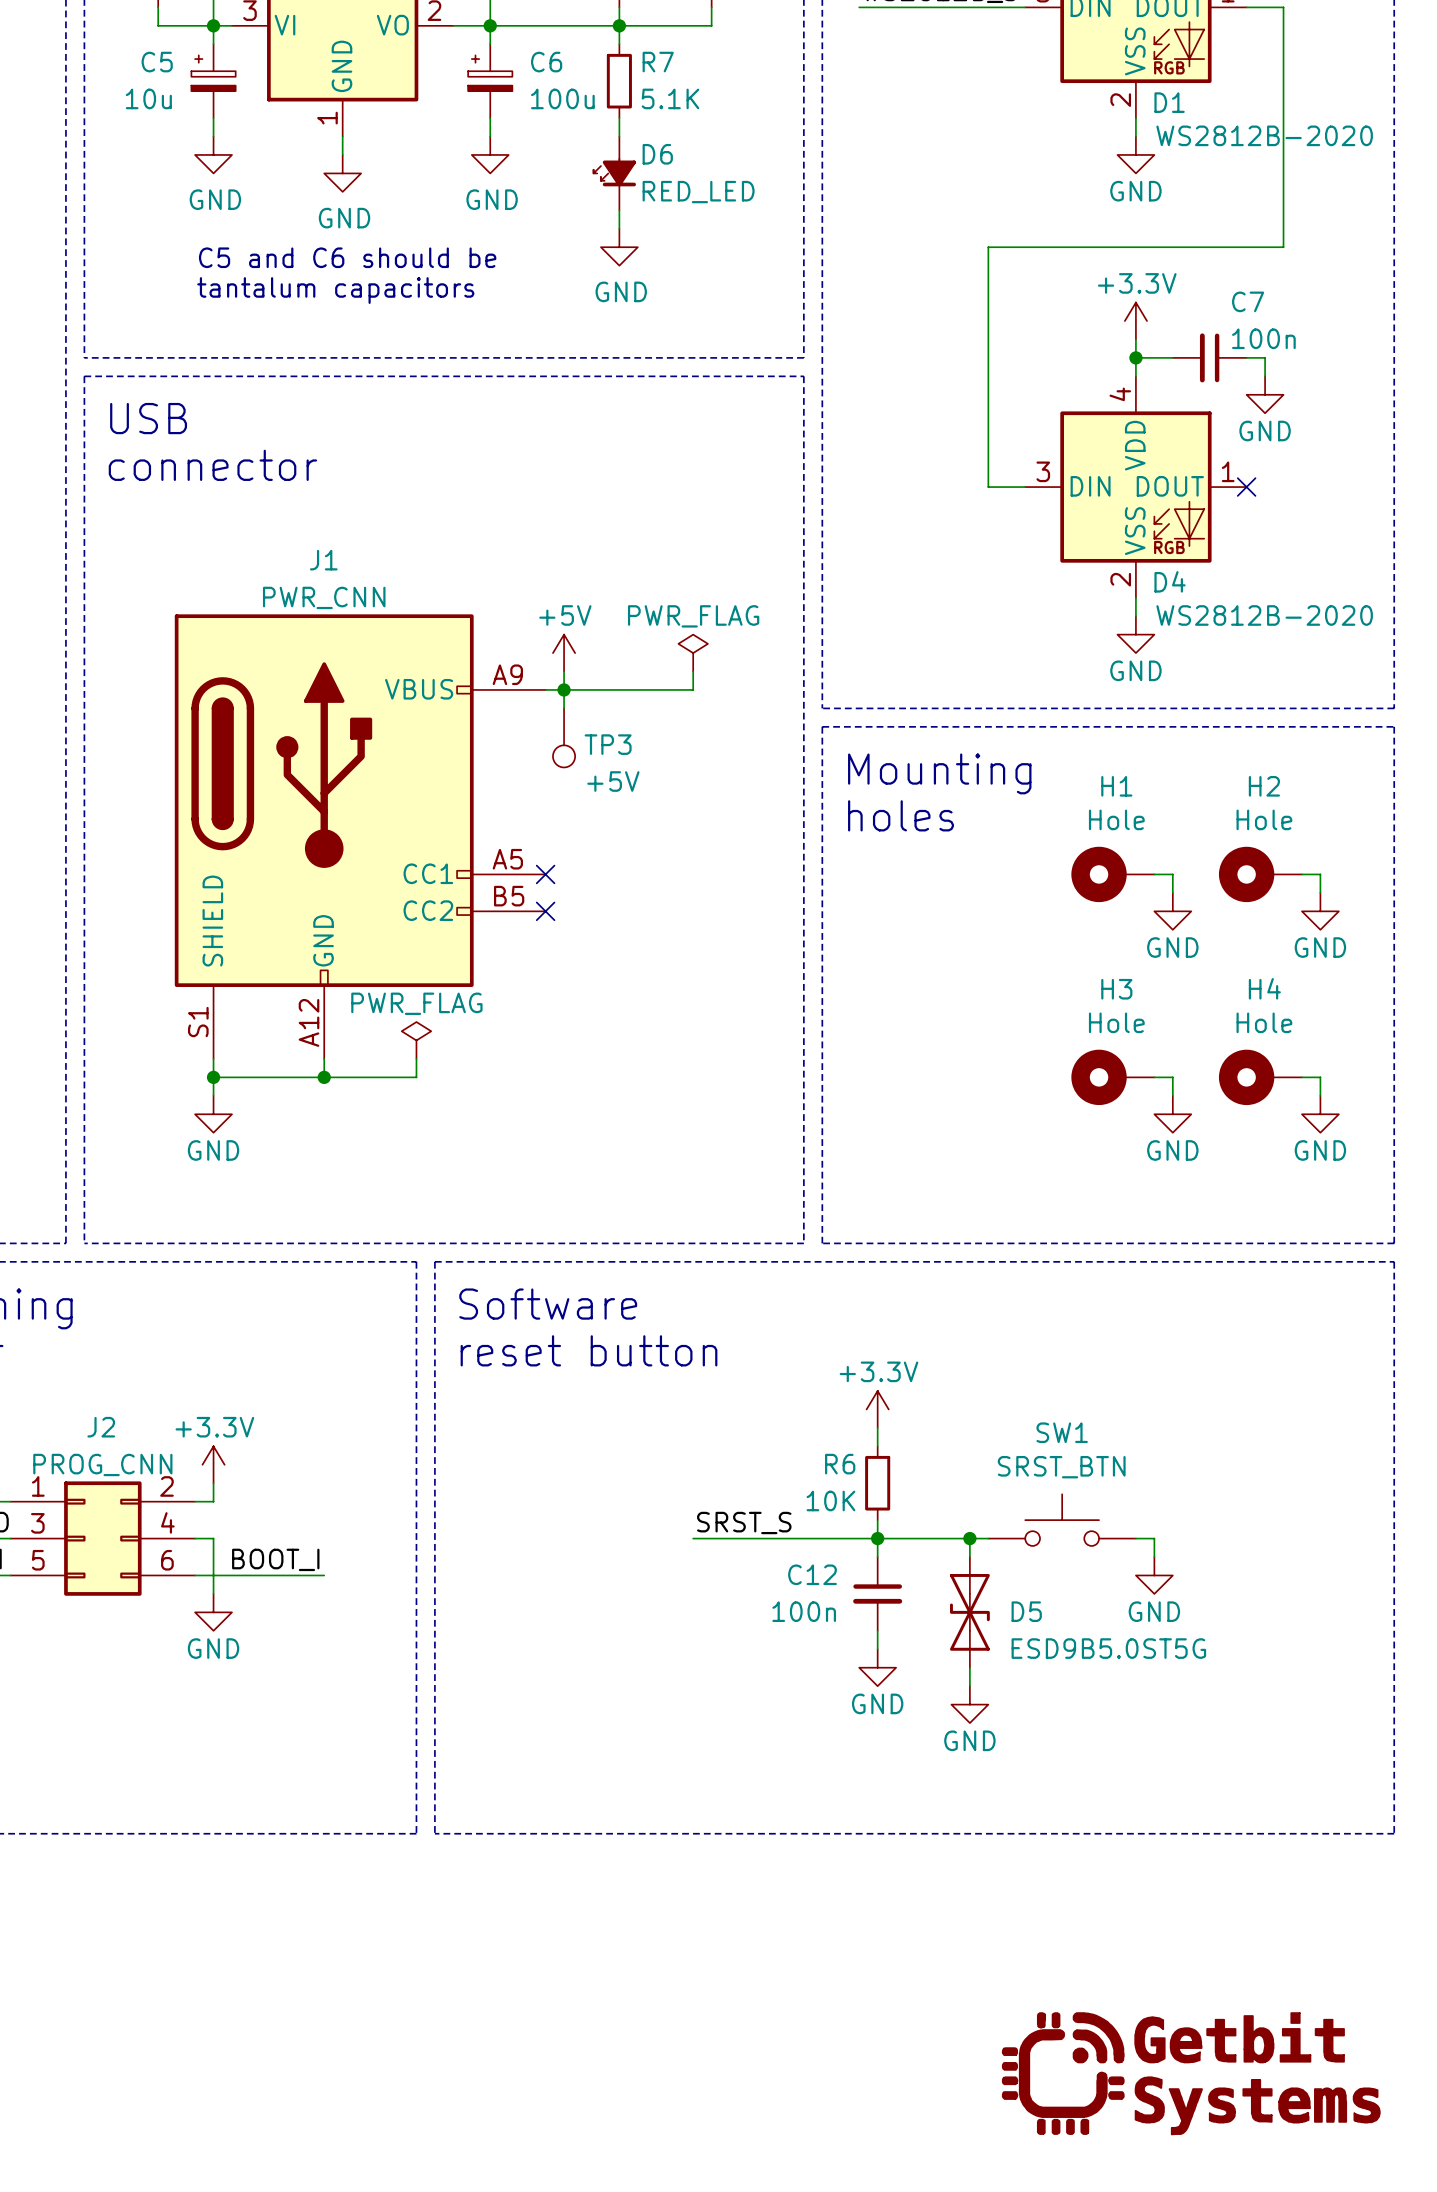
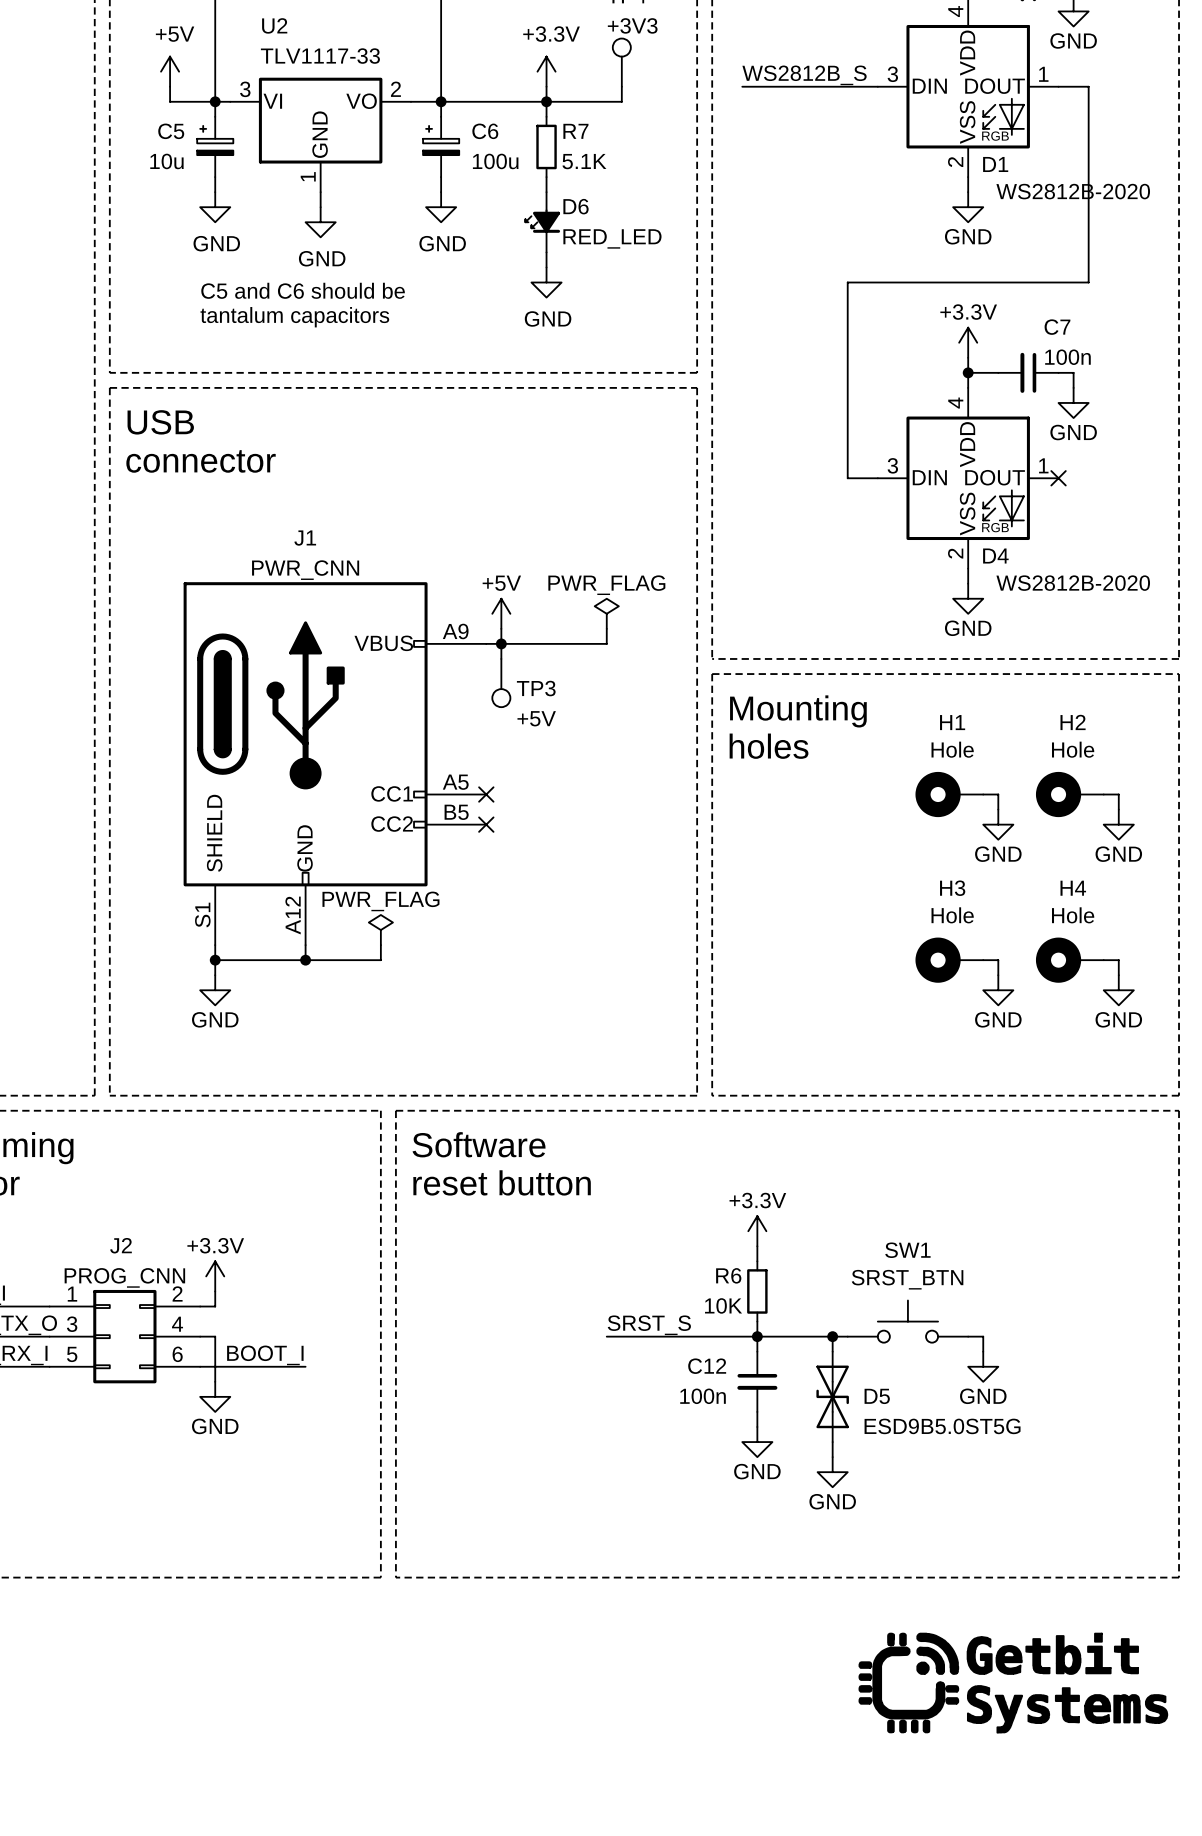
power symbol position: (1191, 2073) -> (1013, 1683)

